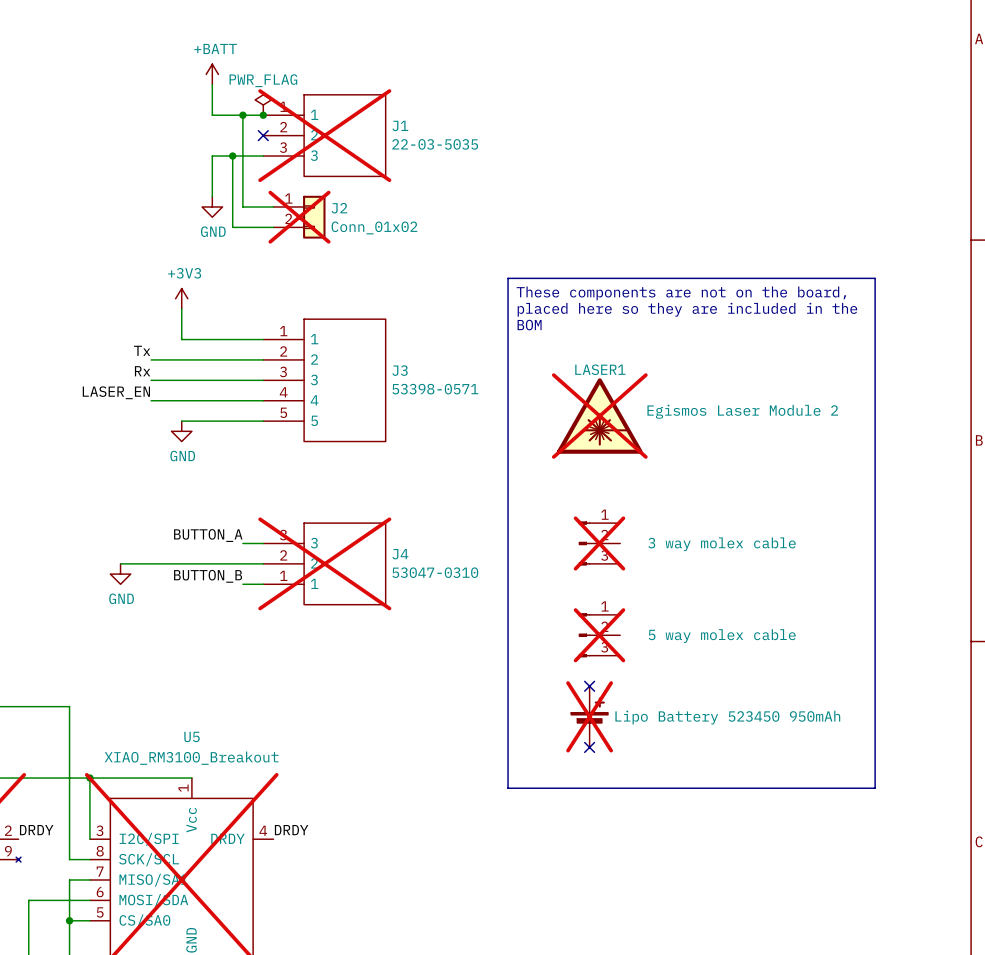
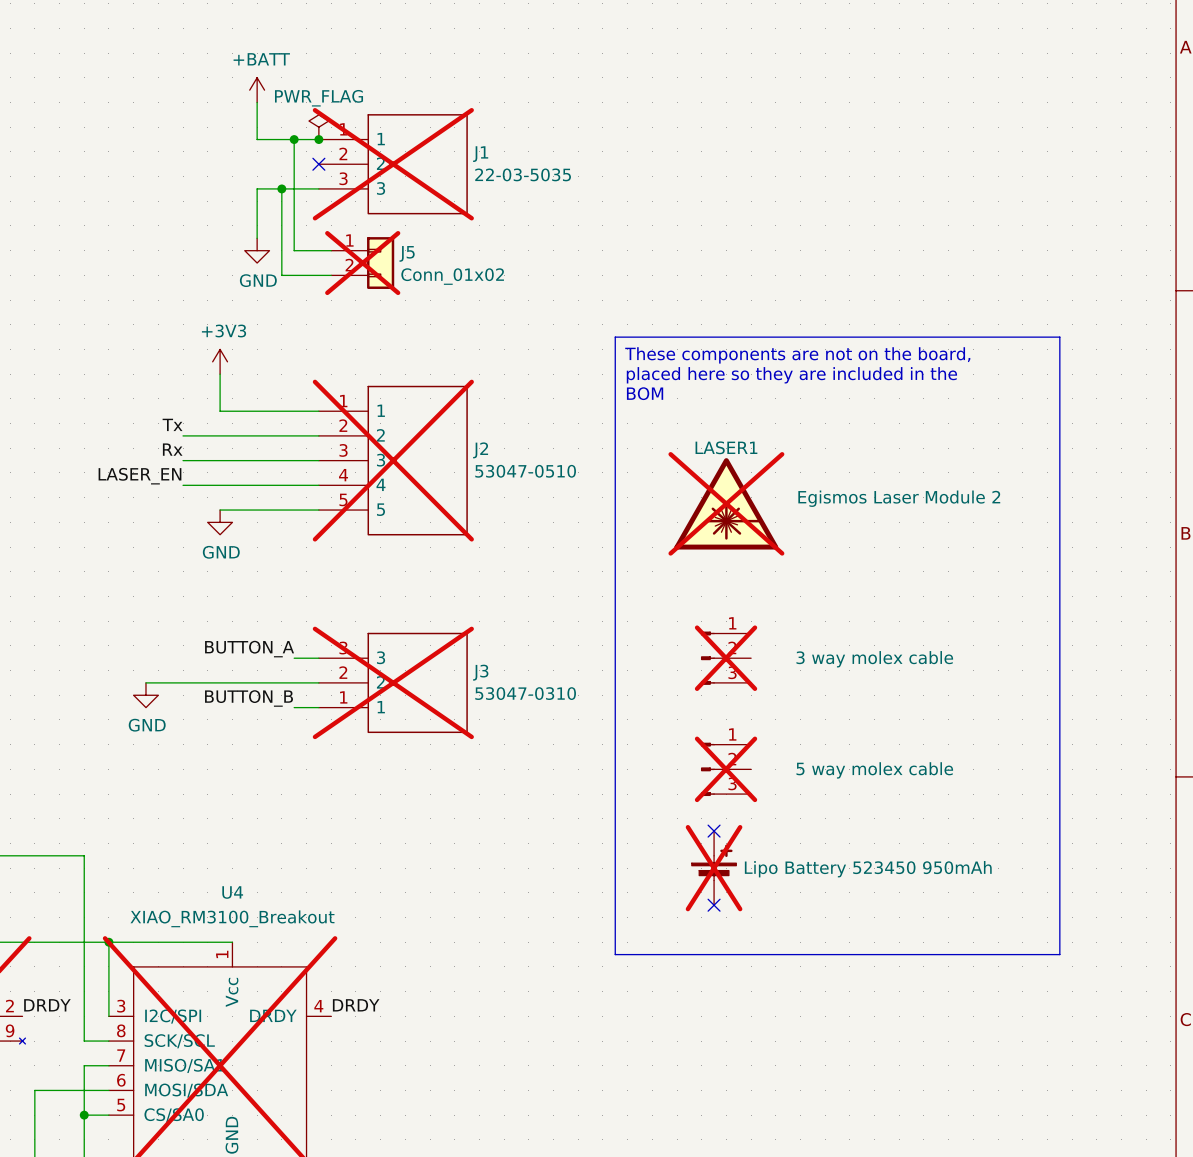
J2 name: J2 (339, 208) -> J5 (407, 253)
J3 name: J3 (400, 370) -> J2 (480, 450)
J3 do-not-place cross: none -> (393, 460)
J3 value: 53398-0571 (435, 389) -> 53047-0510 (525, 471)
J4 name: J4 (400, 554) -> J3 (480, 672)
U5 name: U5 (192, 736) -> U4 (232, 892)

